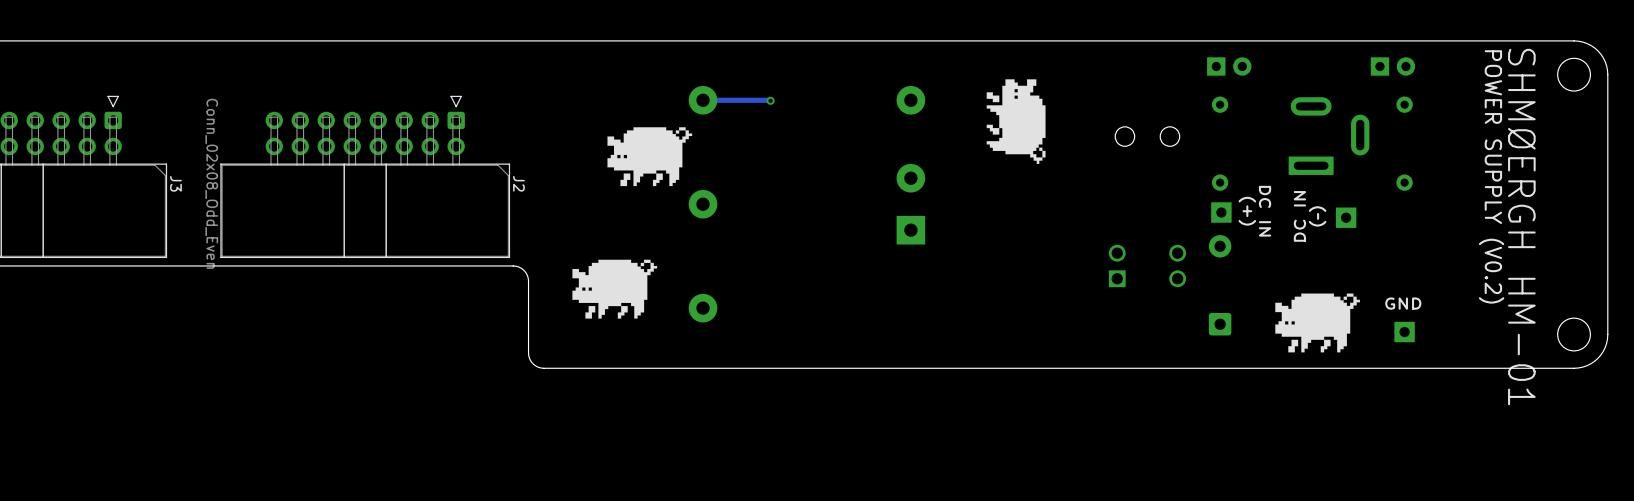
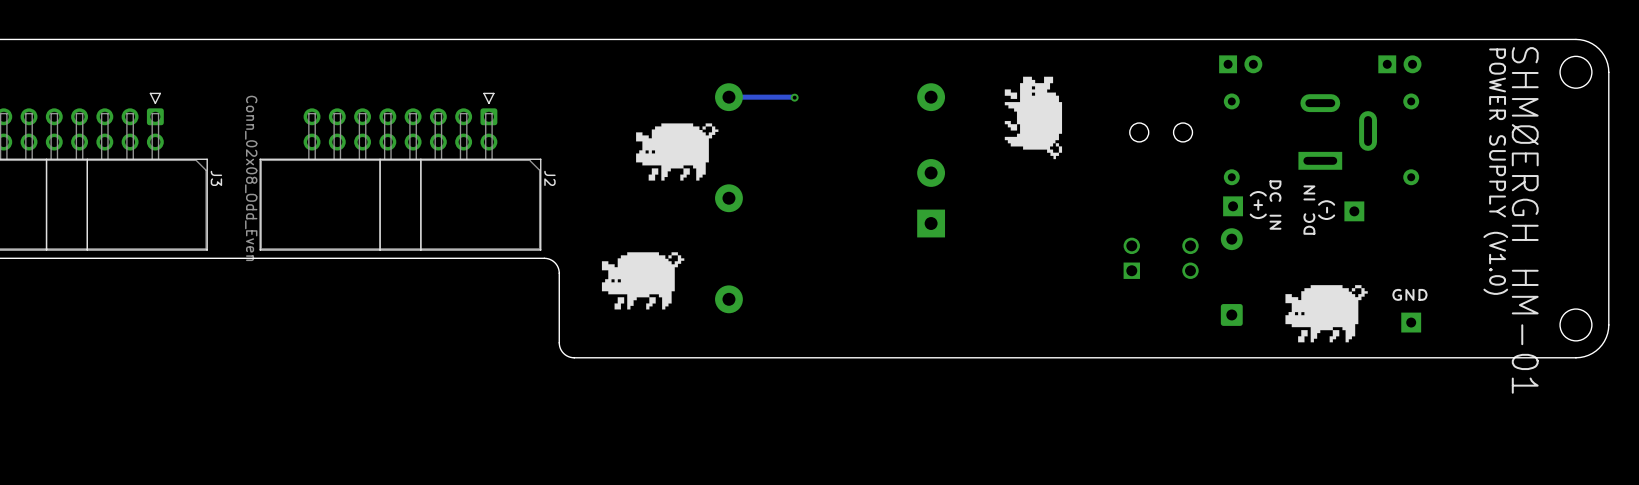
text: POWER SUPPLY (V0.2) (1491, 176) -> POWER SUPPLY (V1.0) (1495, 171)

